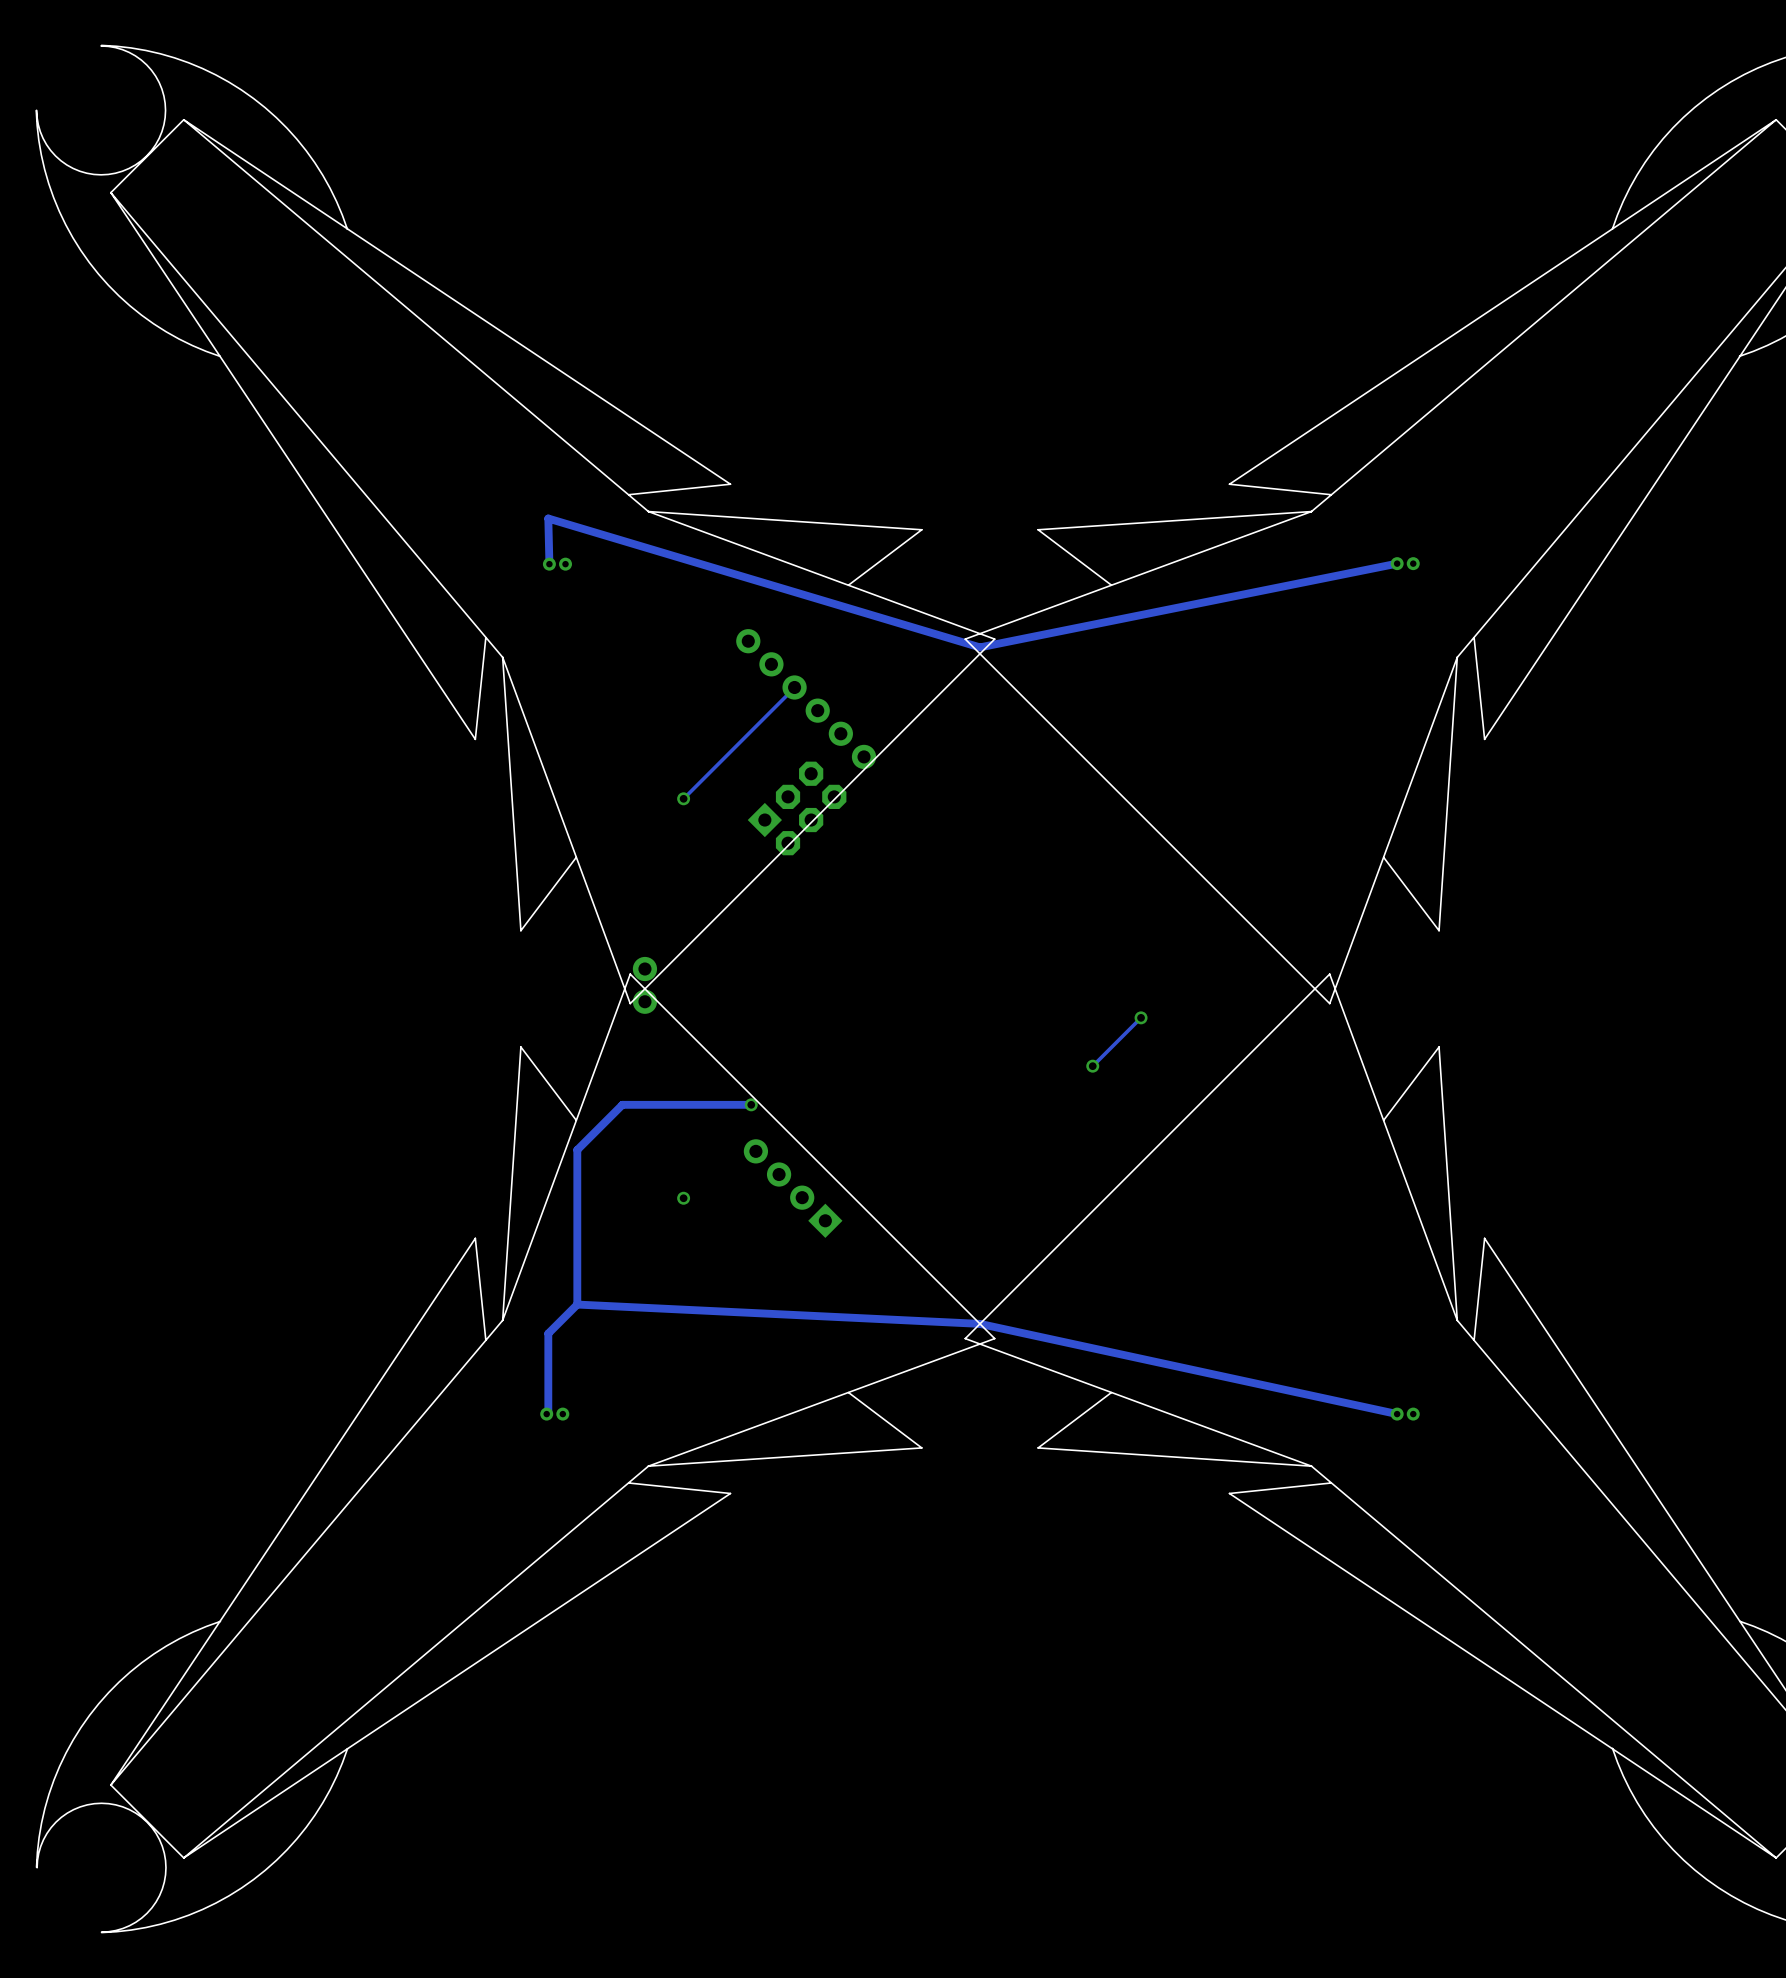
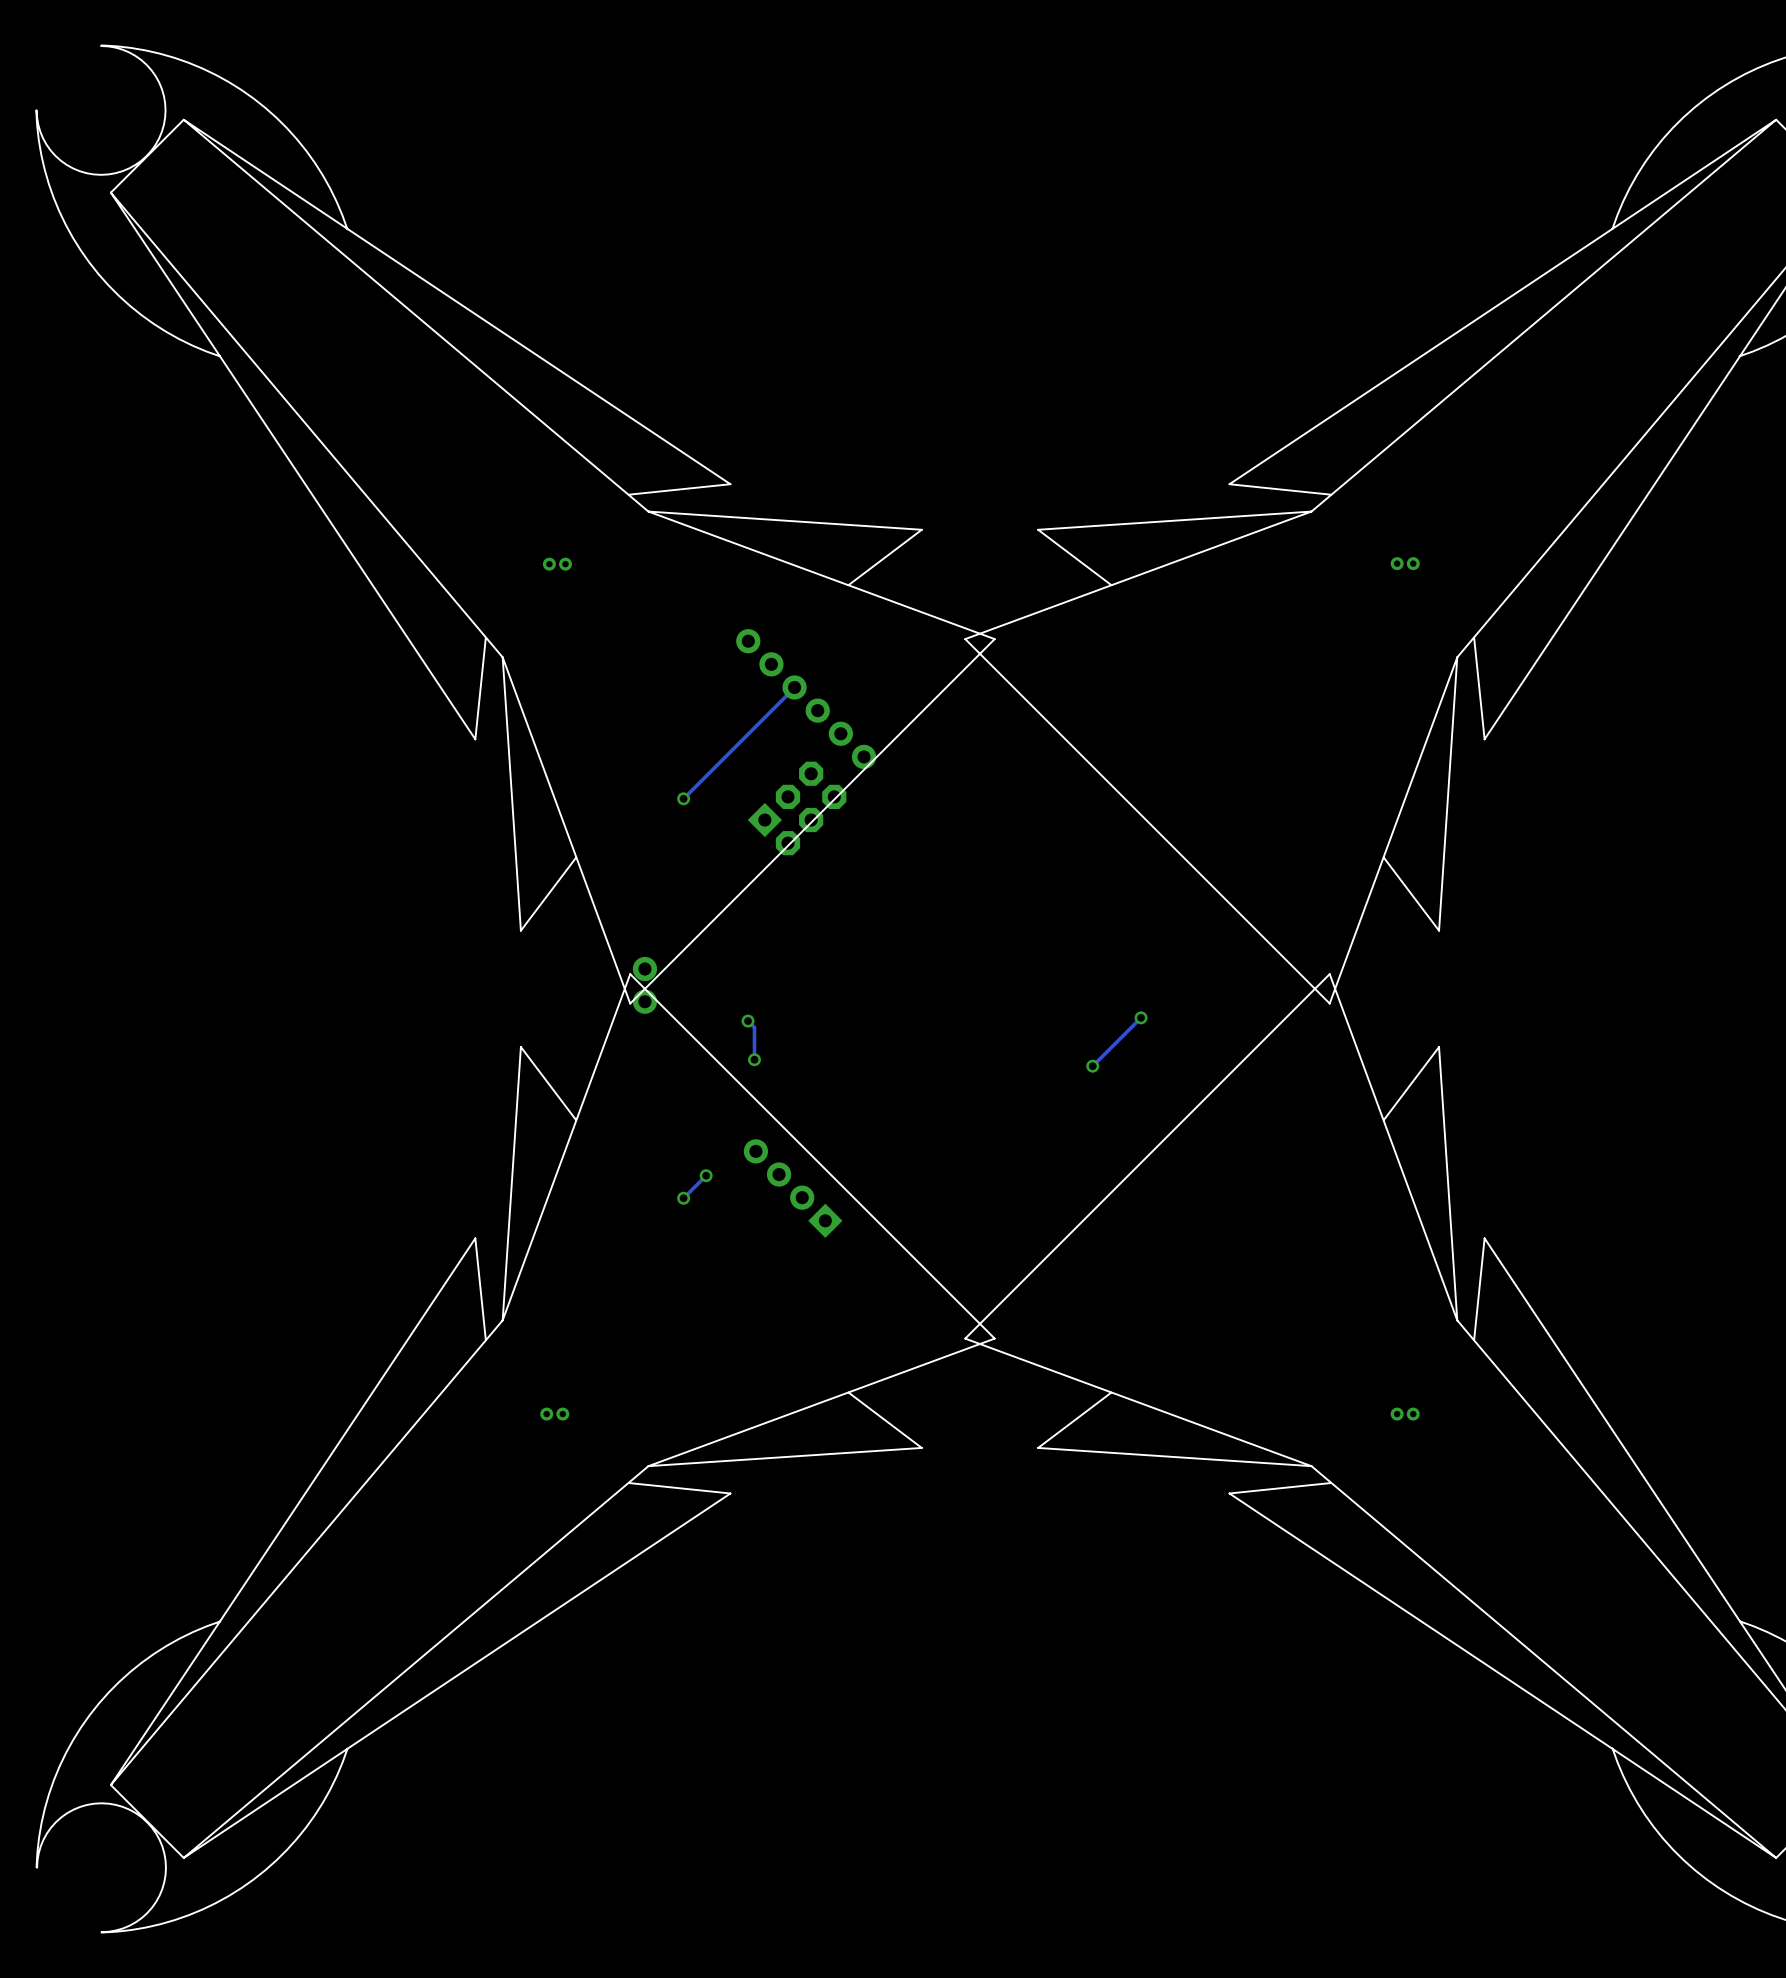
track: (1397, 563) (979, 647) (548, 518) (549, 564) -> none
track: none -> (748, 1021) (754, 1027) (754, 1059)
via: none -> (748, 1021)
via: none -> (754, 1059)
track: (751, 1104) (622, 1104) (577, 1149) (577, 1304) -> none
via: (751, 1104) -> none
track: none -> (706, 1175) (683, 1198)
via: none -> (706, 1175)
track: (577, 1304) (548, 1333) (548, 1412) (546, 1414) -> none
track: (577, 1304) (979, 1323) (1397, 1414) -> none

